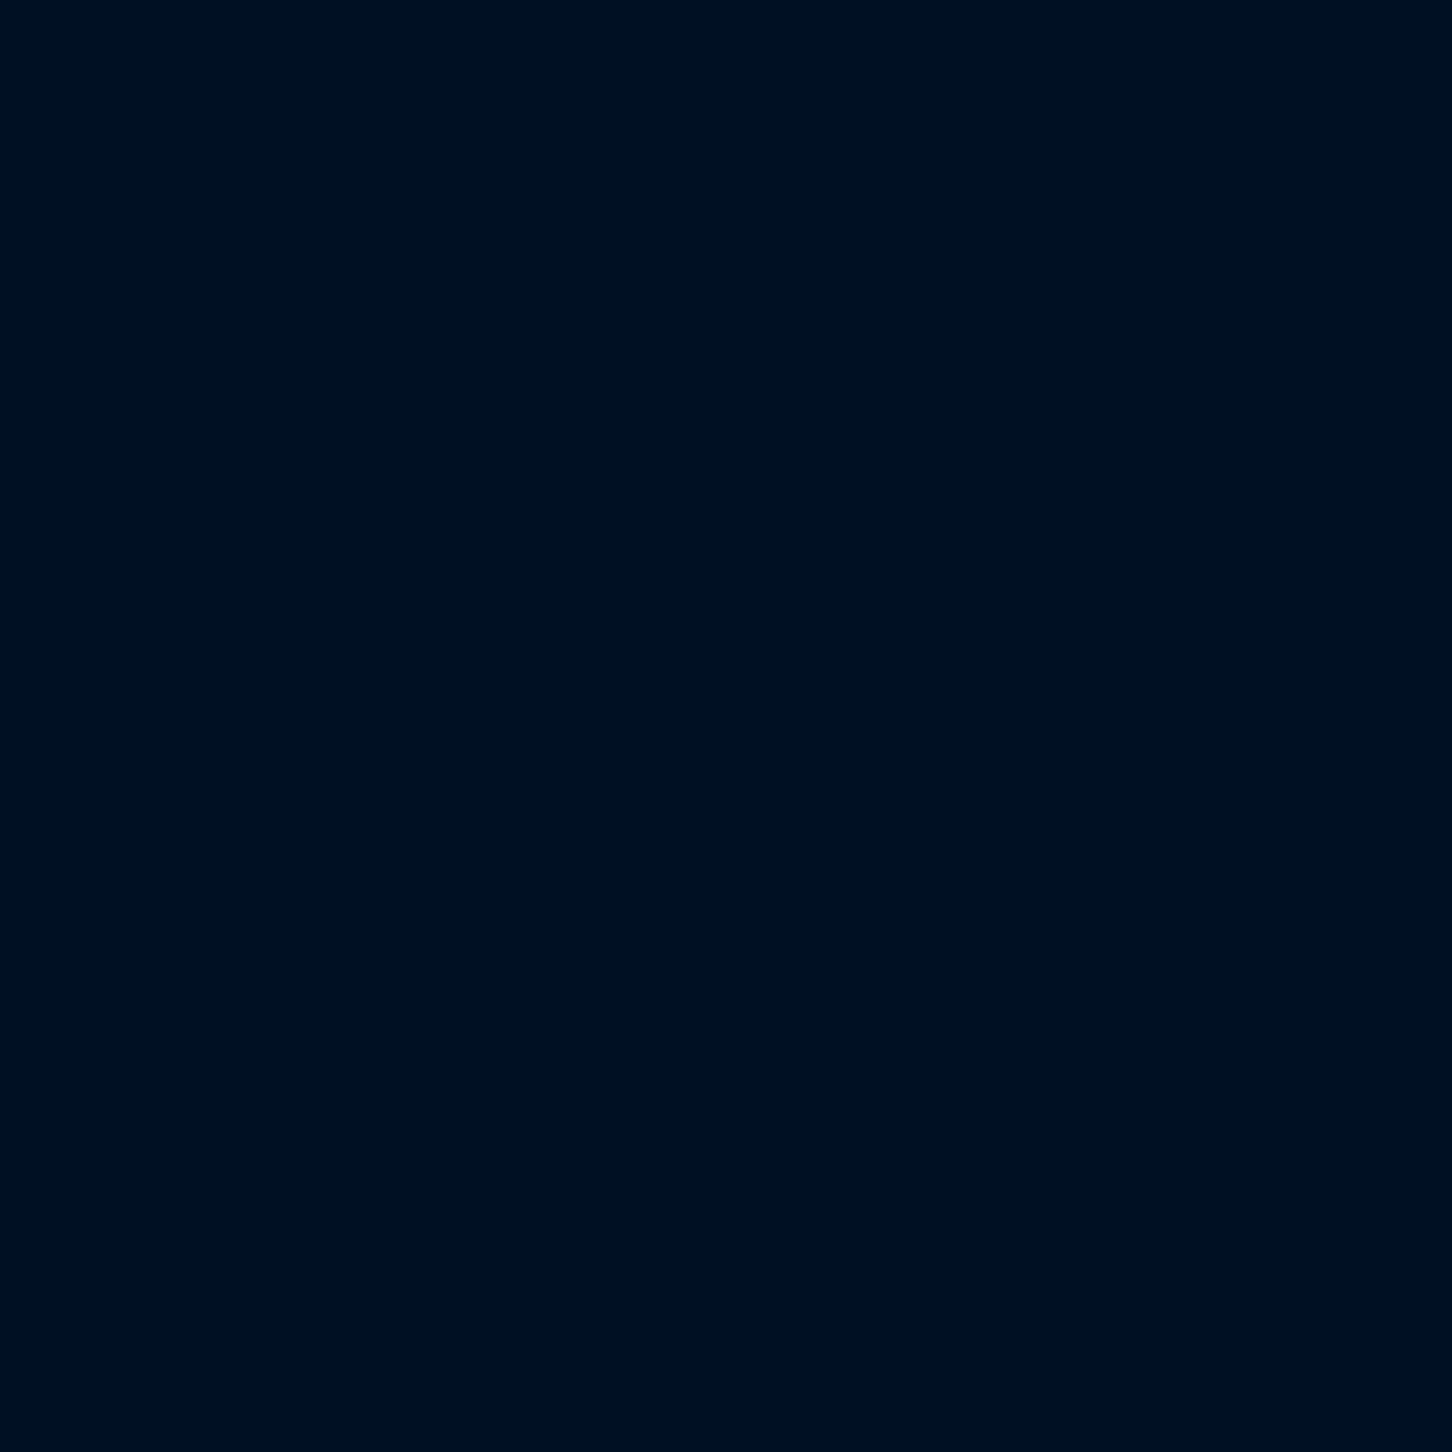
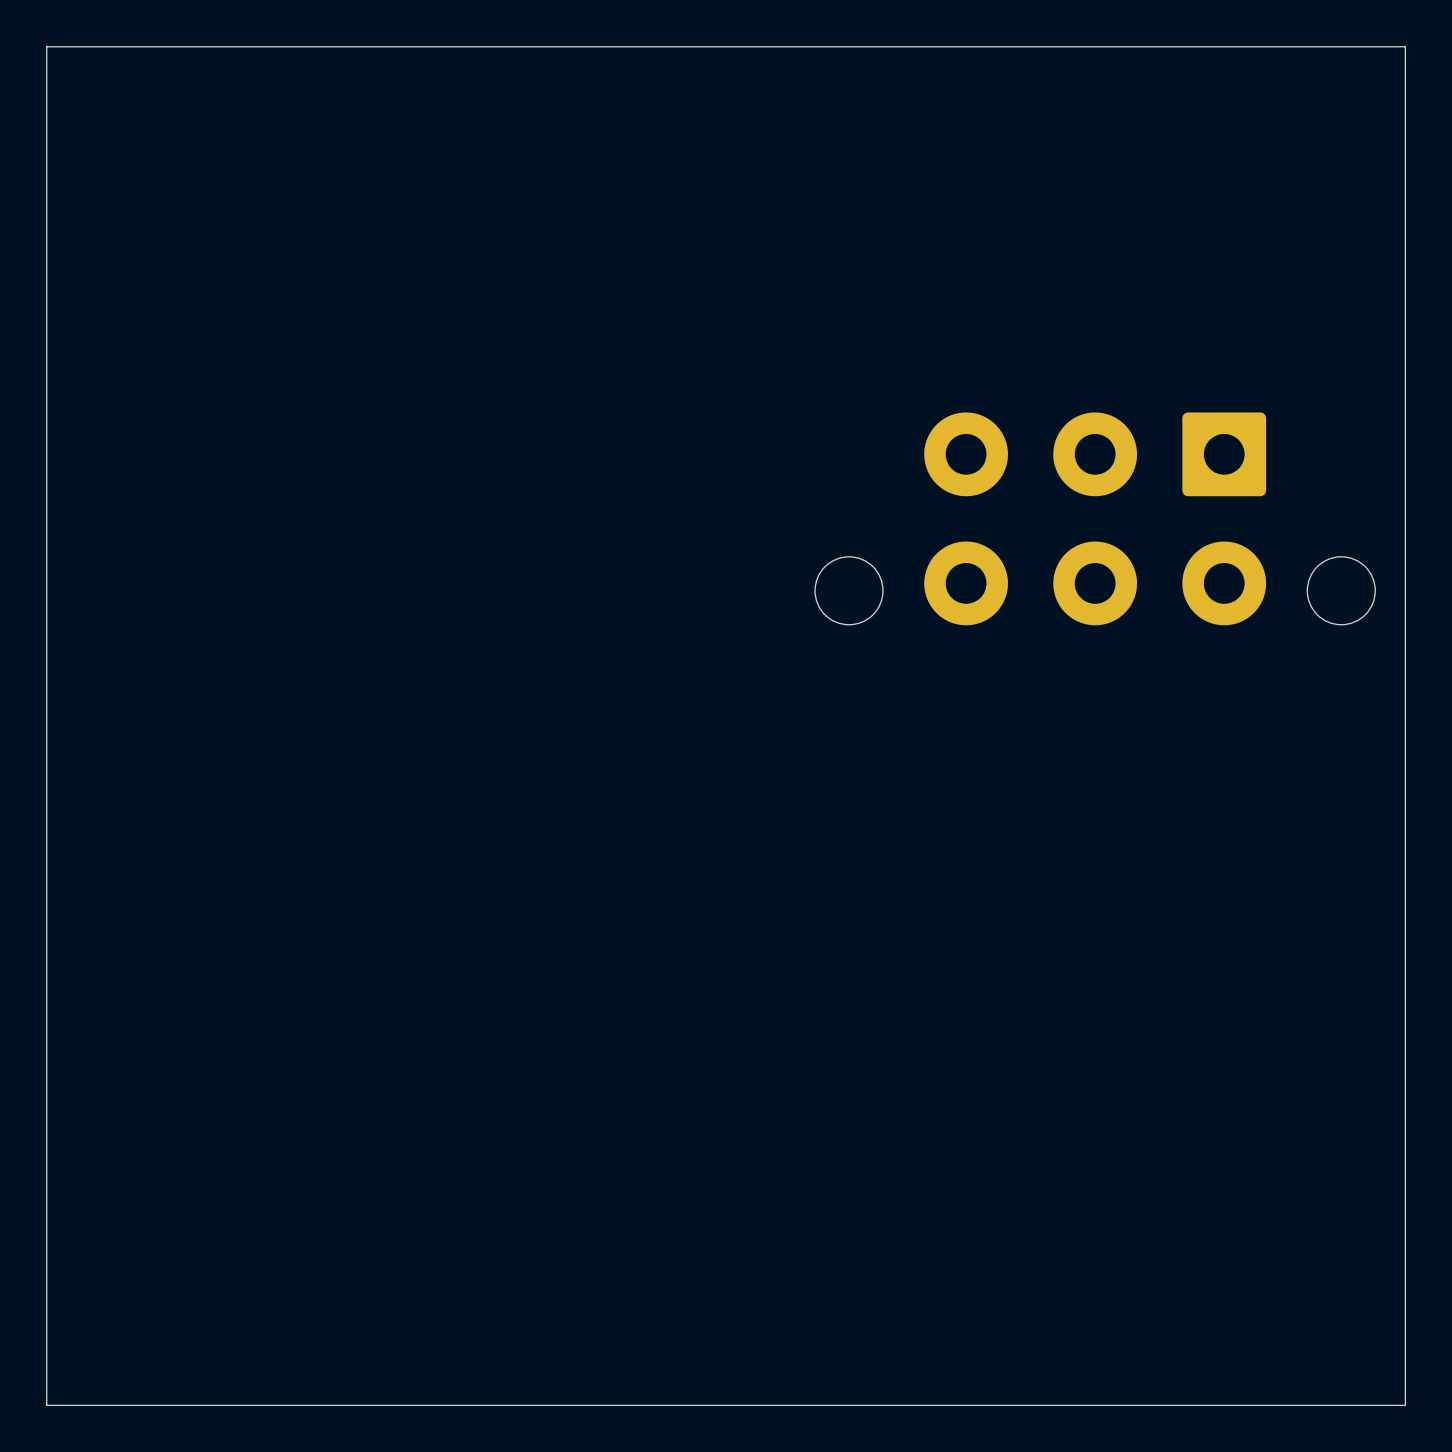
board edge: none -> (1405, 46) (46, 46) (46, 1405) (1405, 1405) (1405, 46)
part: none -> (1095, 518)

